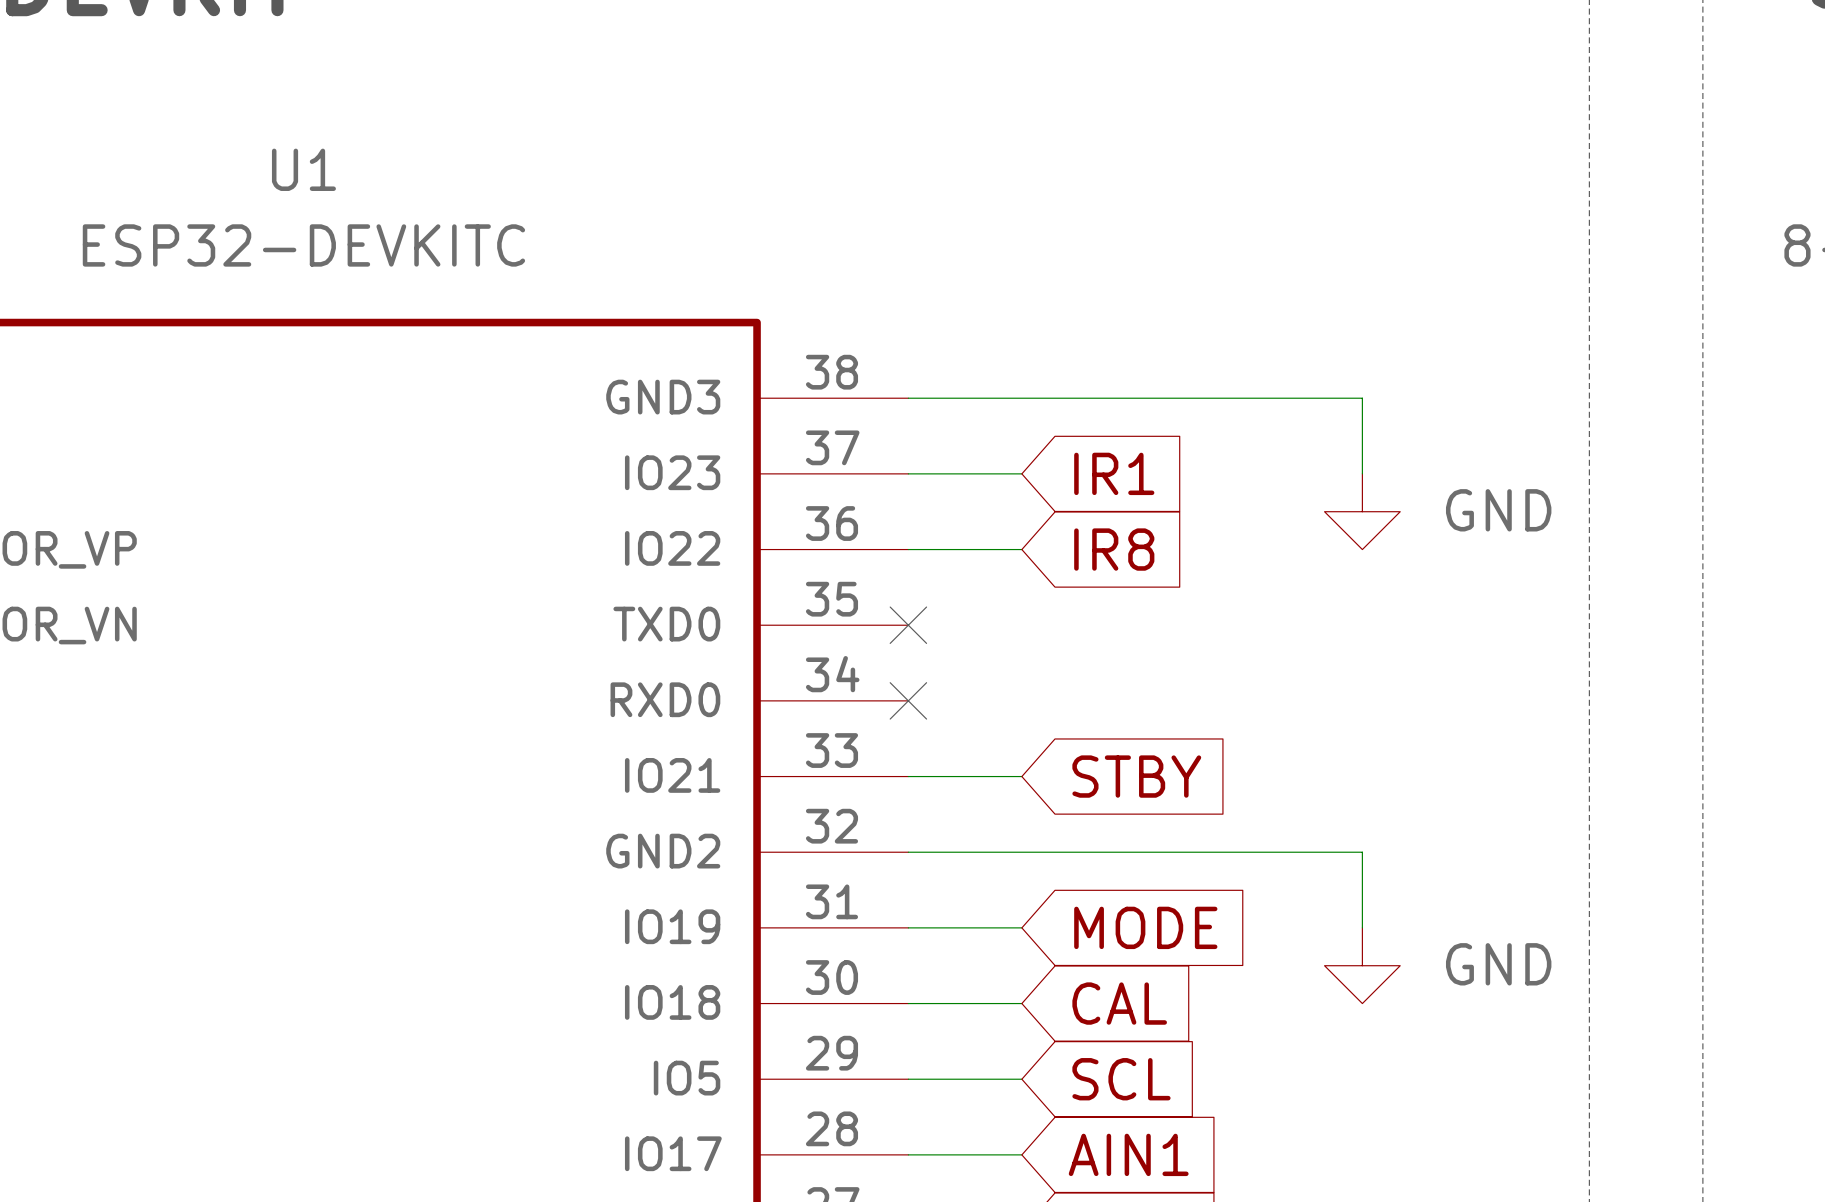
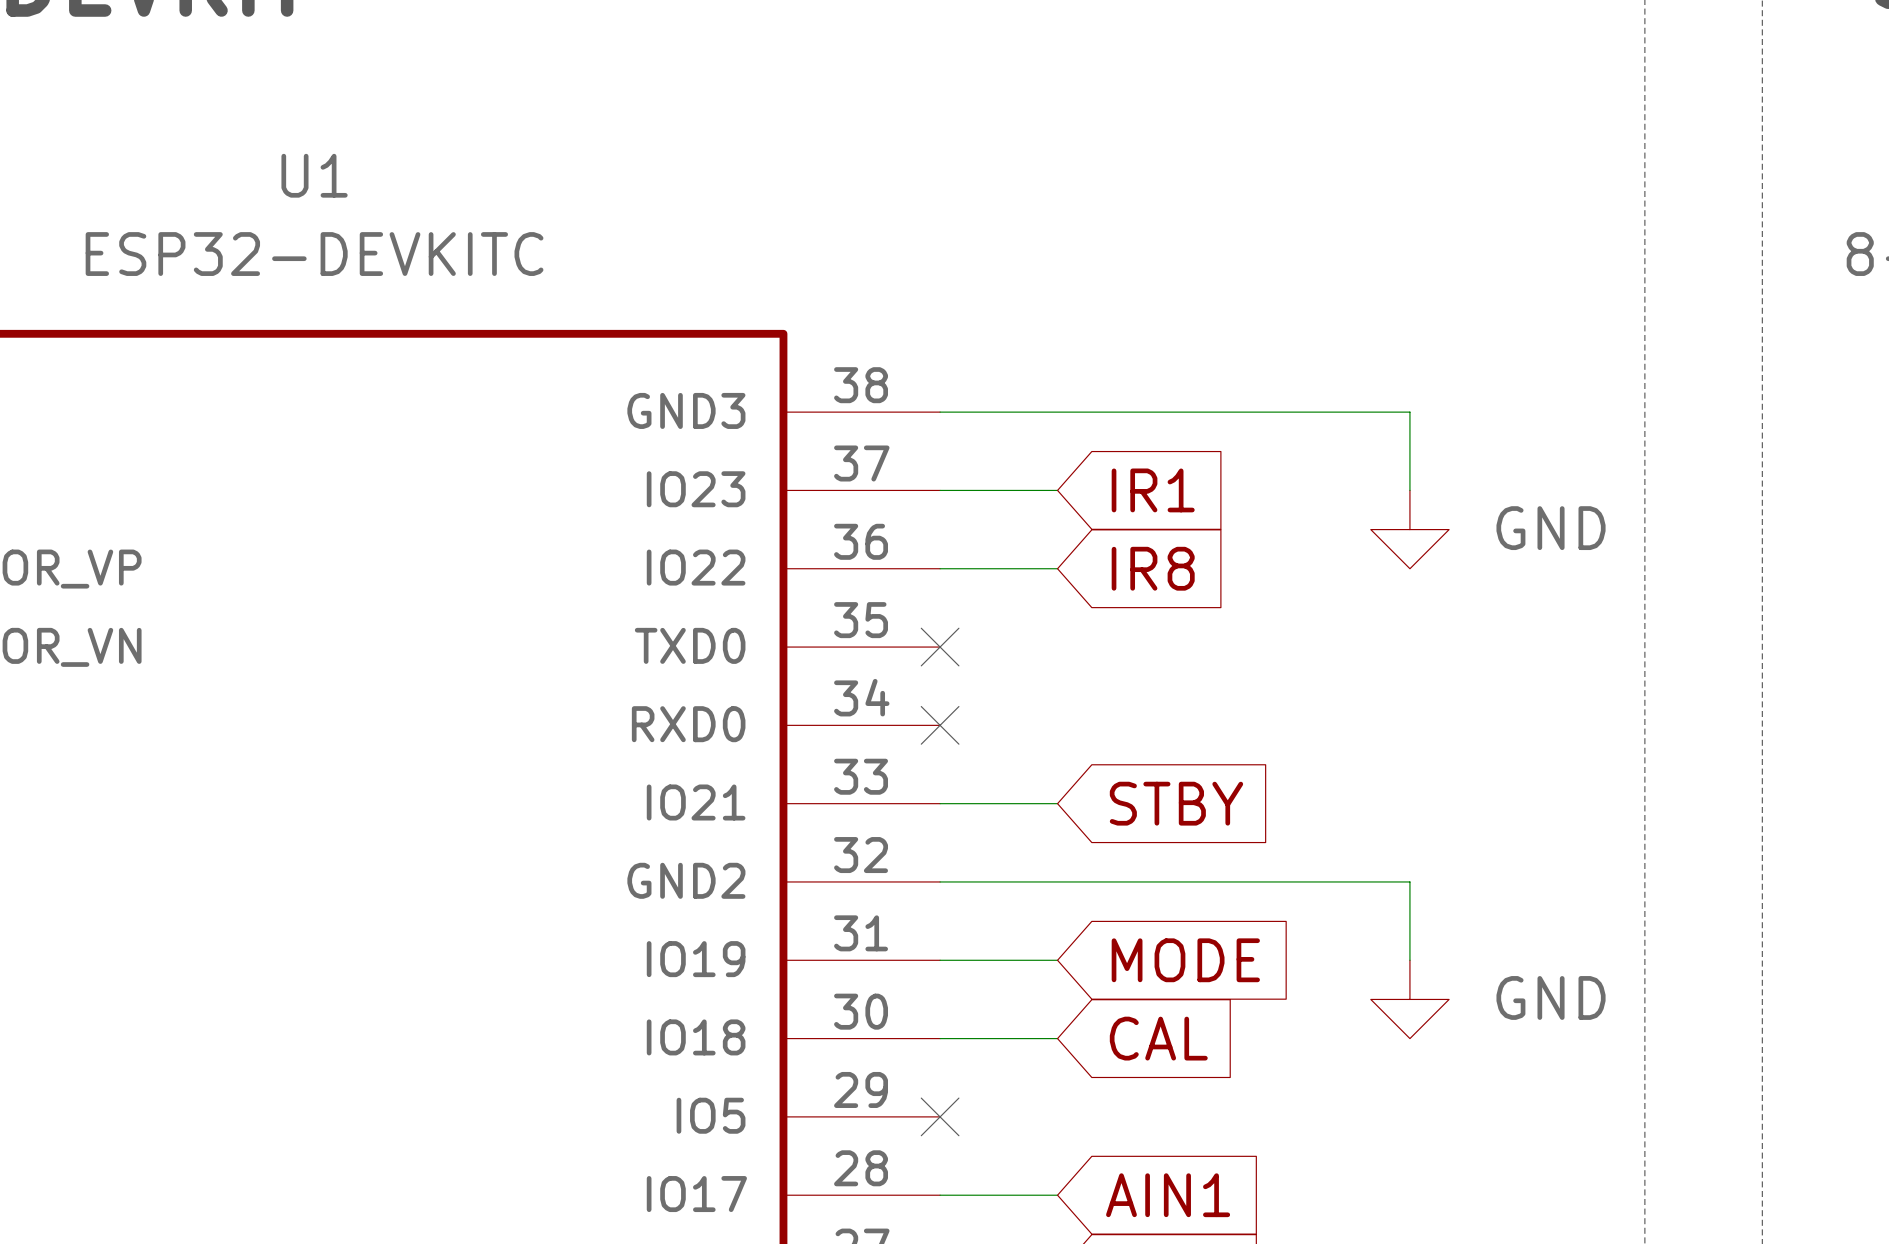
wire: (908, 1079) (1021, 1079) -> none
no-connect mark: none -> (940, 1116)
global label: SCL (1121, 1079) -> none

